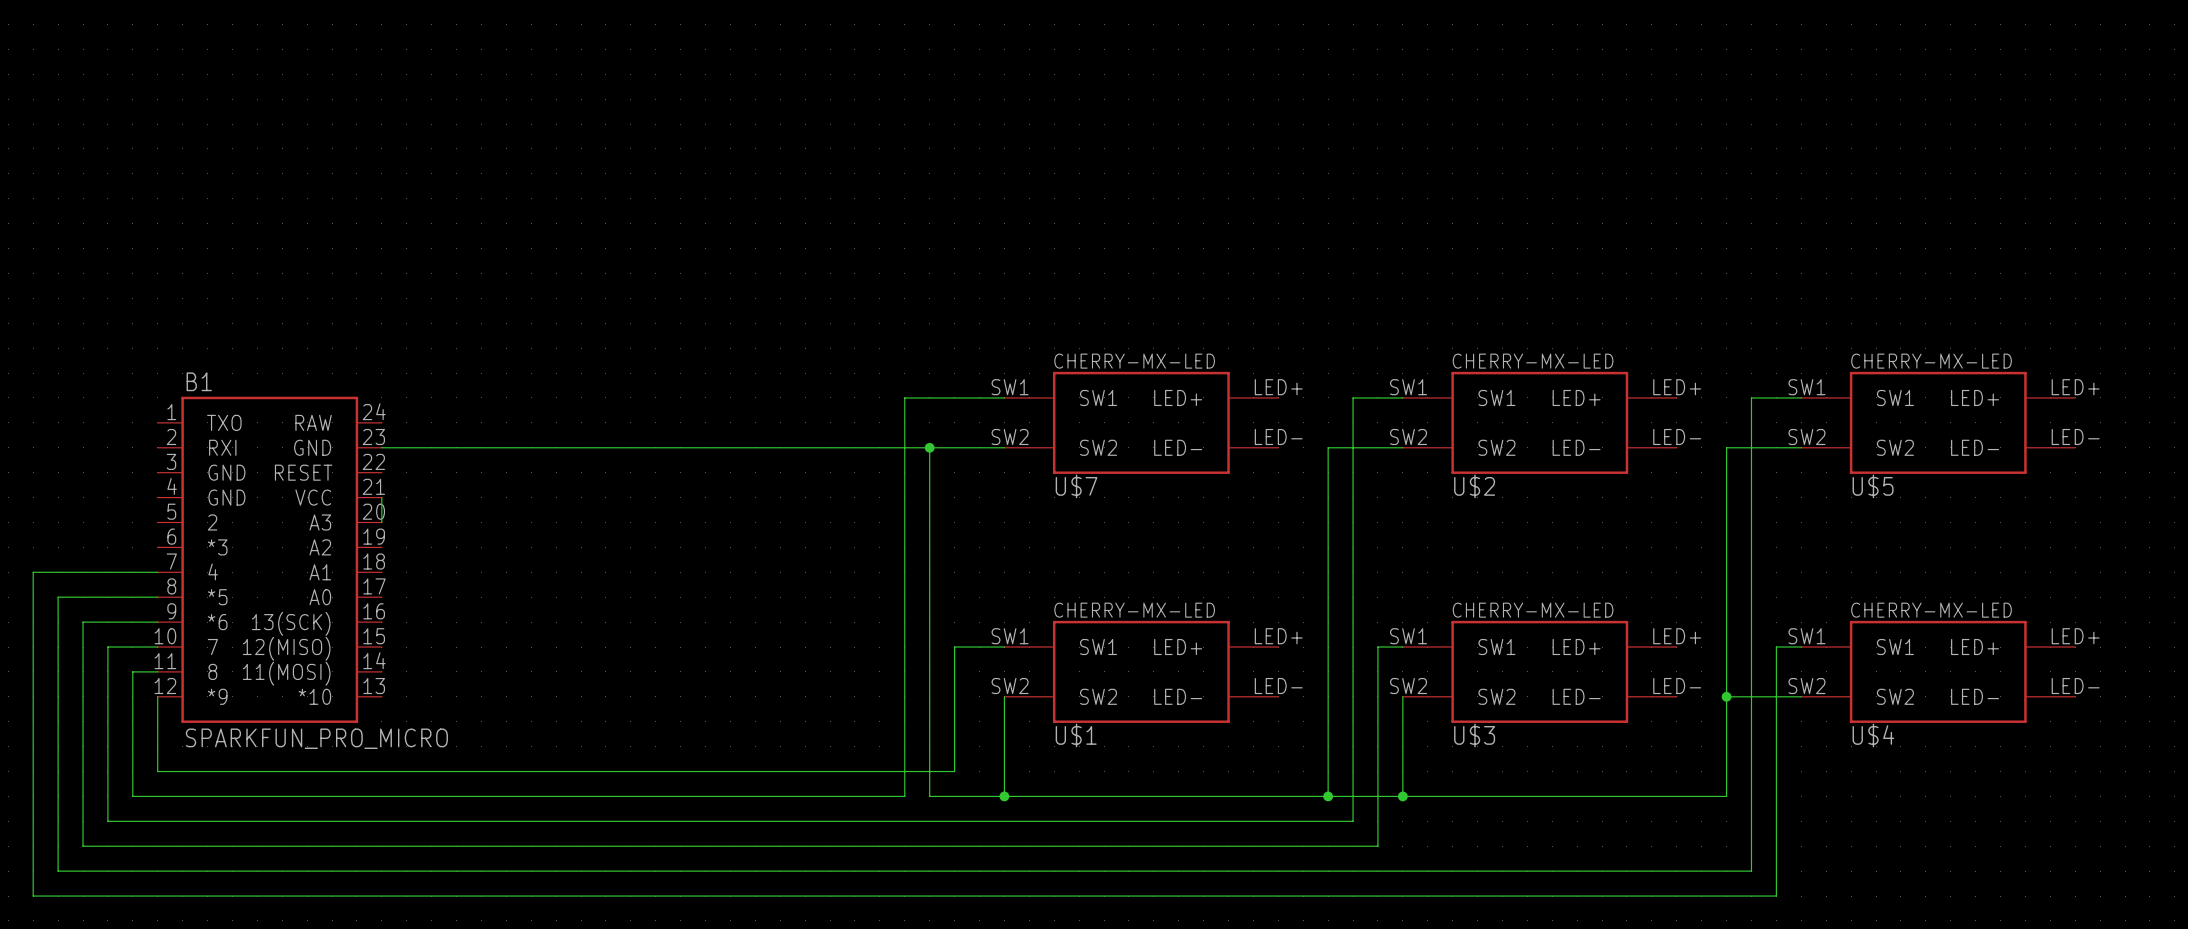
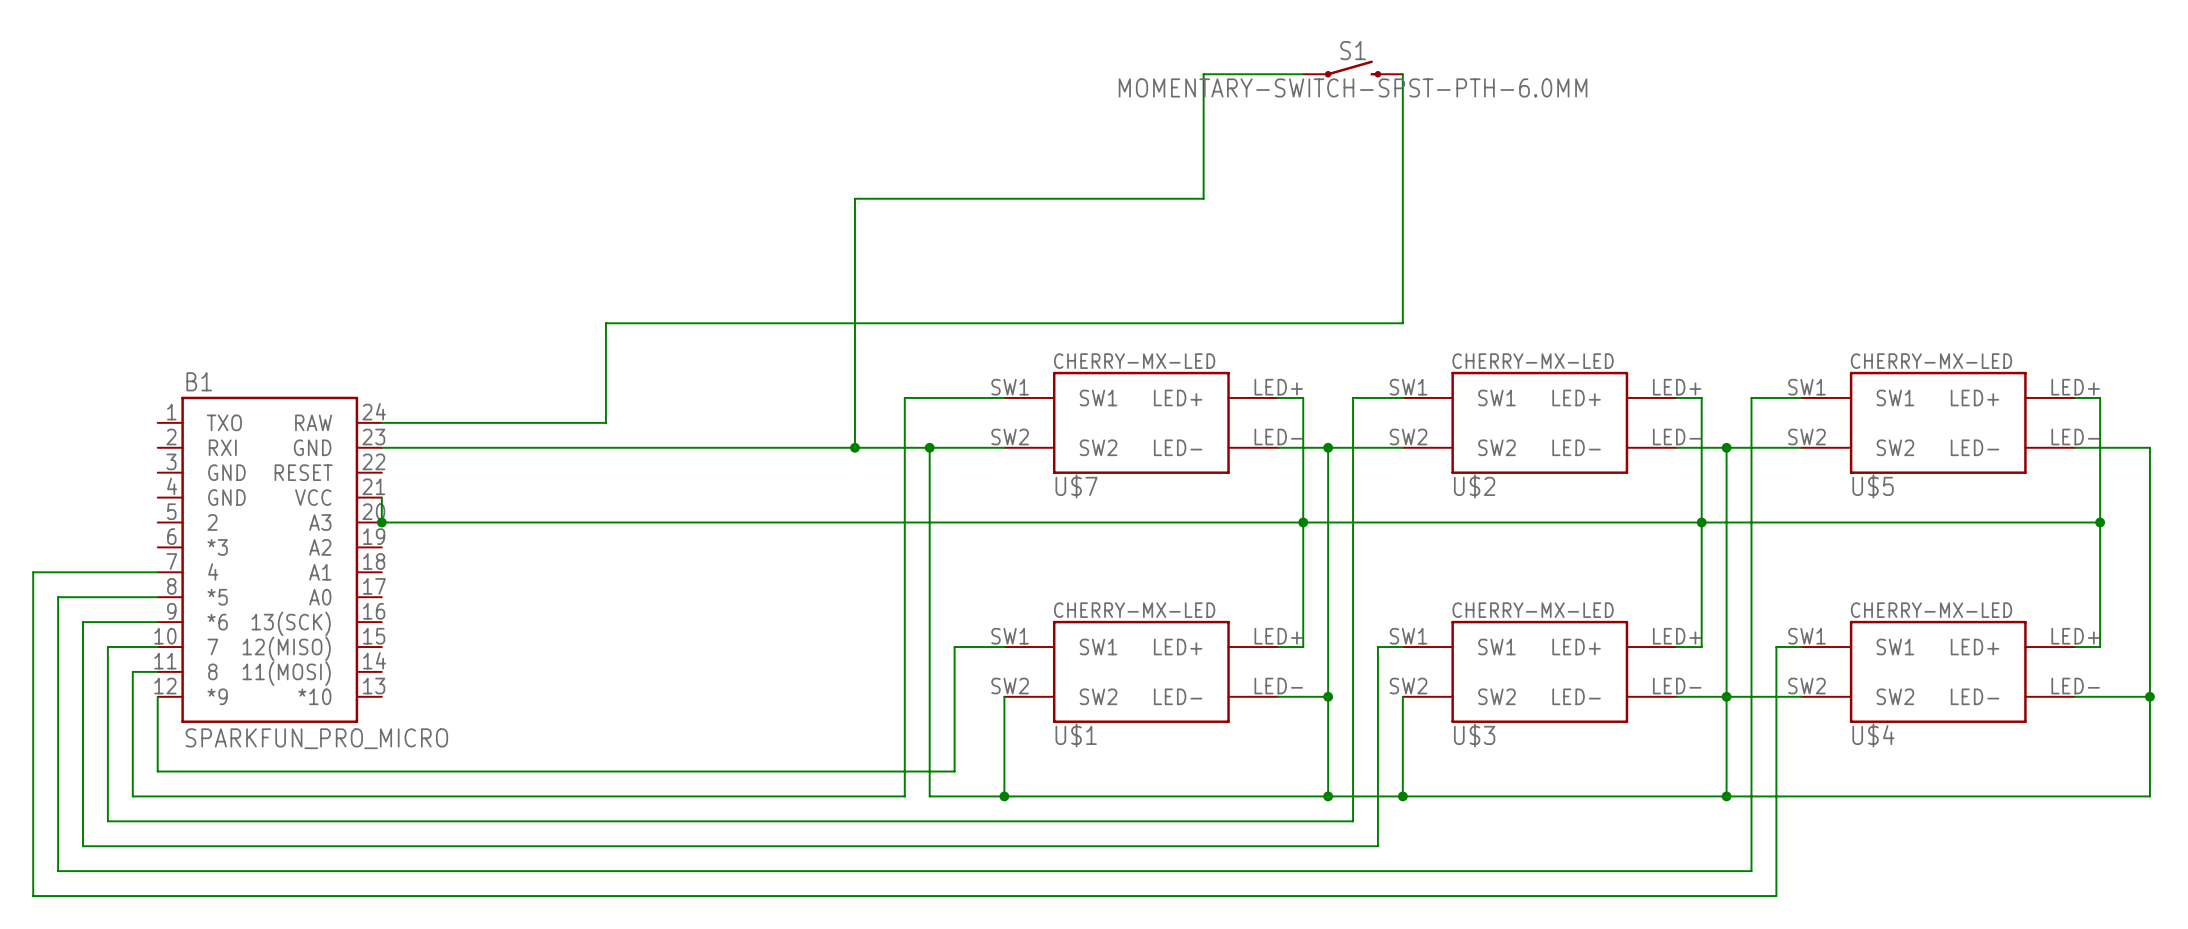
S1: none -> MOMENTARY-SWITCH-SPST-PTH-6.0MM (1353, 69)
wire: none -> (1303, 74) (1203, 74) (1203, 198) (854, 198) (854, 447)
wire: none -> (1402, 74) (1402, 323) (605, 323) (605, 422) (381, 422)
wire: none -> (1278, 397) (1303, 397) (1303, 647) (1278, 647)
wire: none -> (1676, 397) (1701, 397) (1701, 647) (1676, 647)
wire: none -> (2075, 397) (2100, 397) (2100, 647) (2075, 647)
junction: none -> (854, 447)
wire: none -> (1278, 447) (1328, 447)
junction: none -> (1328, 447)
wire: none -> (1676, 447) (1726, 447)
junction: none -> (1726, 447)
wire: none -> (2075, 447) (2149, 447) (2149, 796) (1726, 796)
wire: none -> (381, 522) (2100, 522)
junction: none -> (381, 522)
junction: none -> (1303, 522)
junction: none -> (1701, 522)
junction: none -> (2100, 522)
wire: none -> (1278, 696) (1328, 696)
junction: none -> (1328, 696)
wire: none -> (1676, 696) (1726, 696)
wire: none -> (2075, 696) (2149, 696)
junction: none -> (2149, 696)
junction: none -> (1726, 796)

